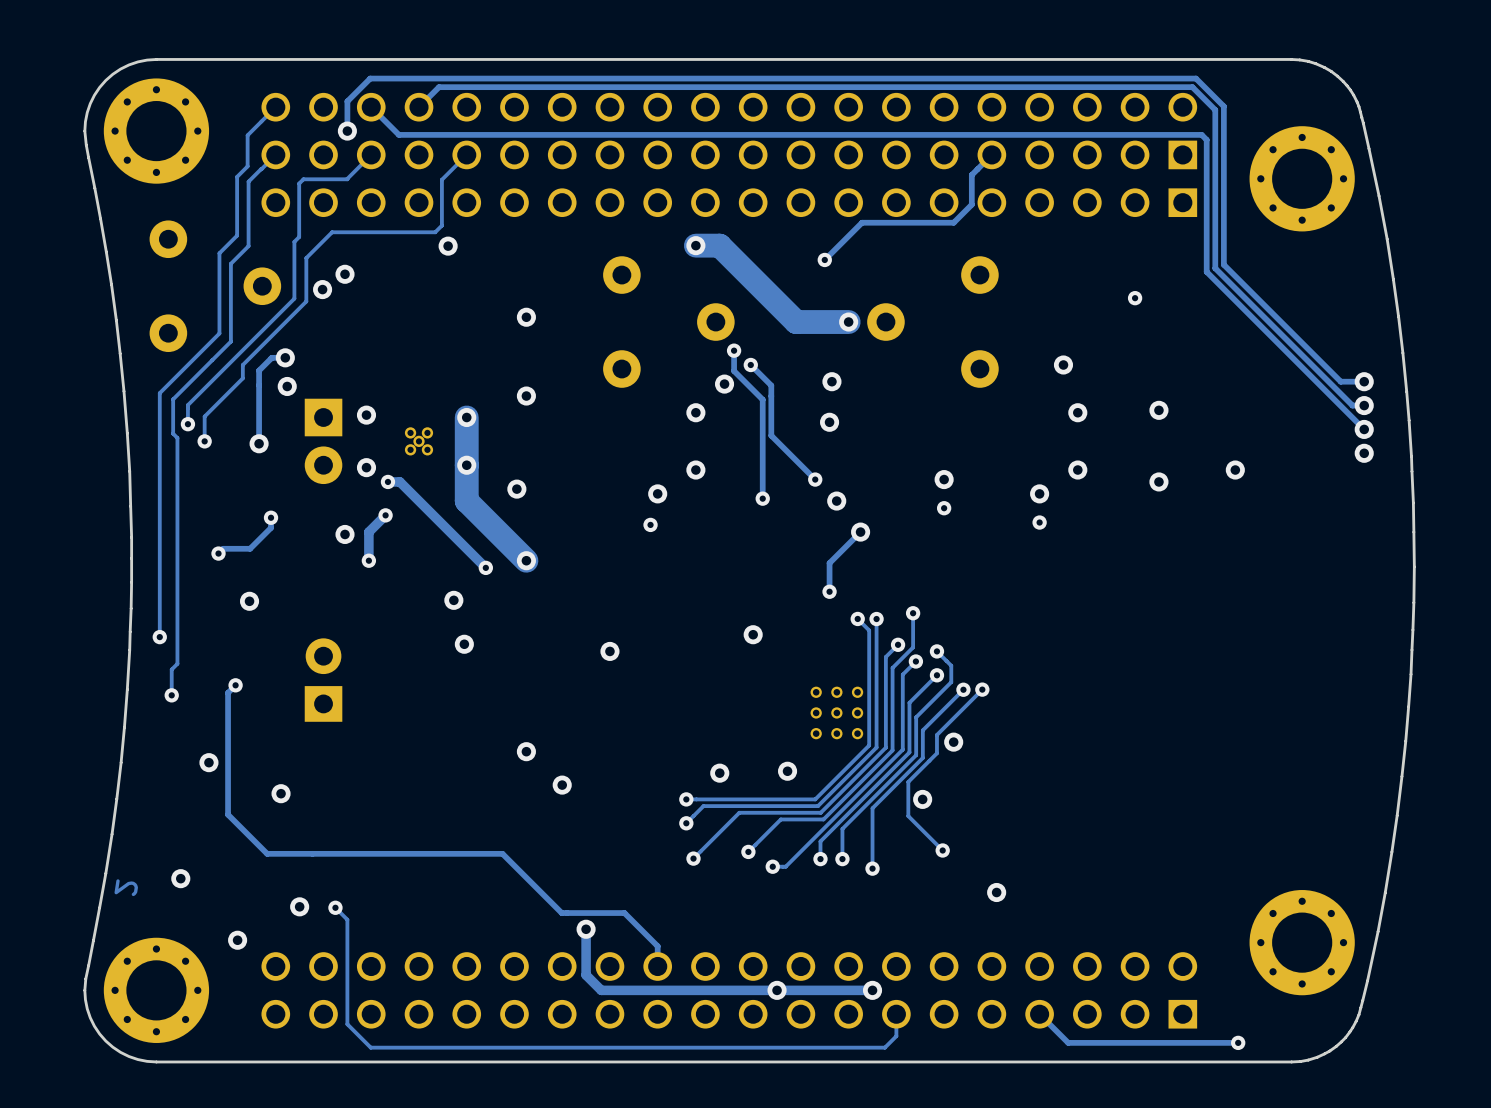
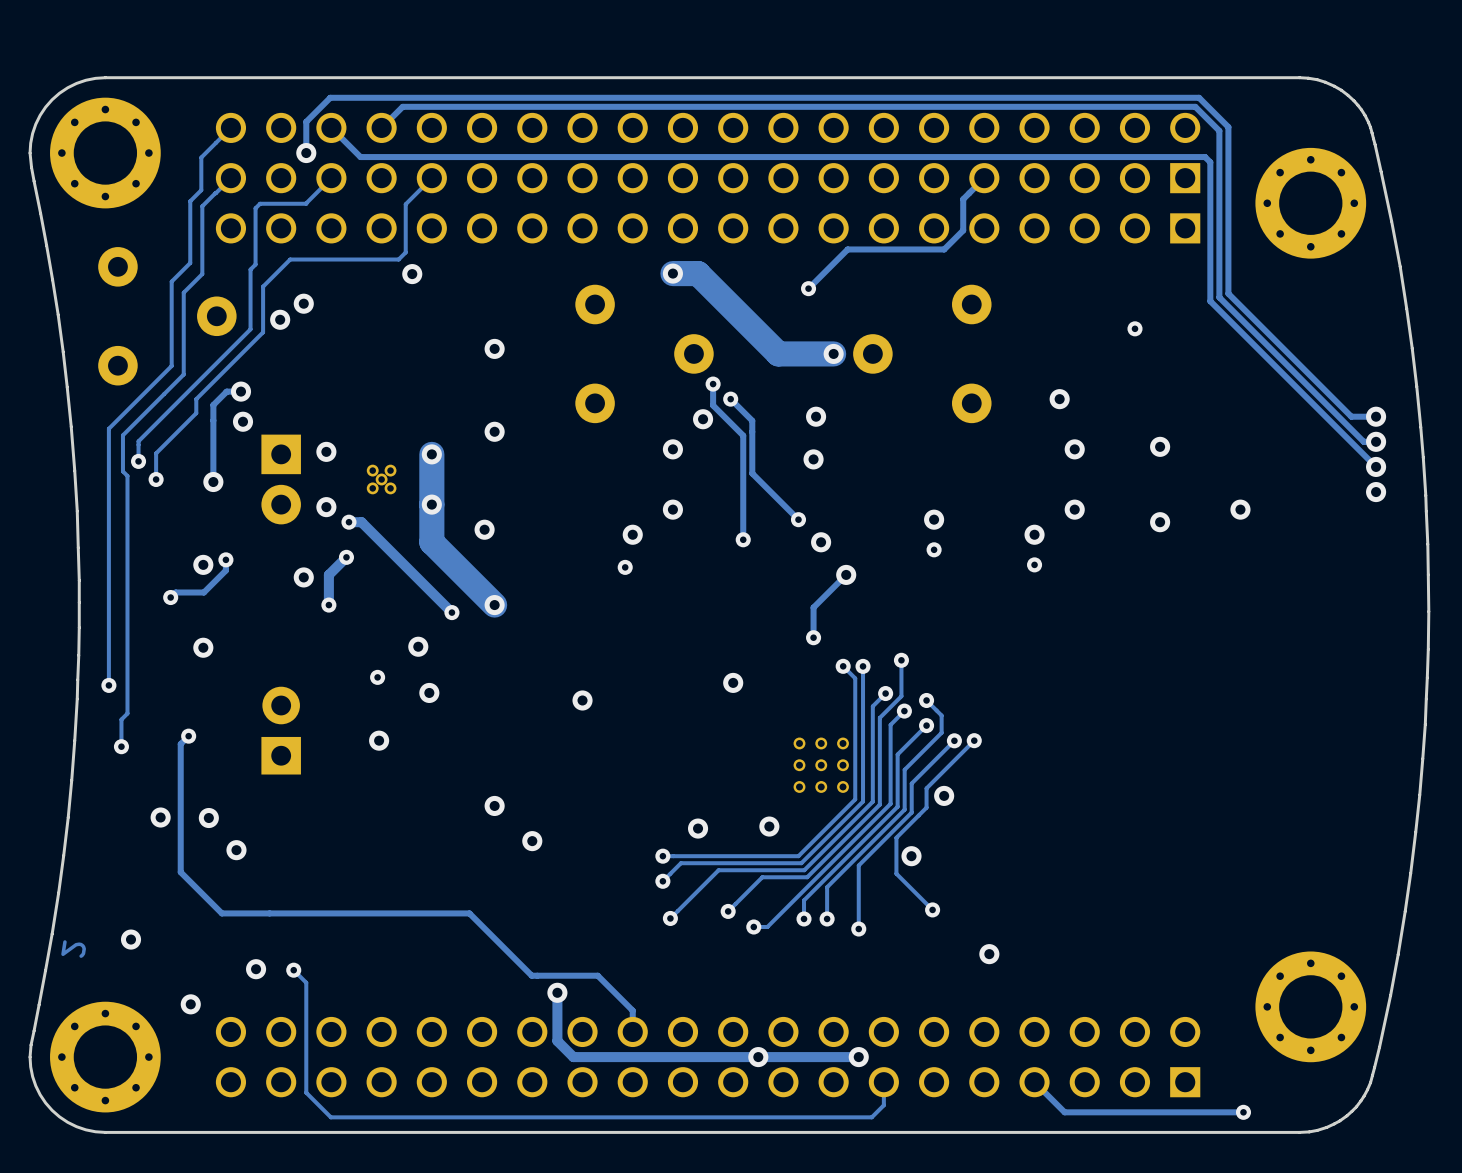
via: none -> (203, 564)
via: none -> (377, 677)
via: none -> (379, 740)
via: none -> (208, 818)

